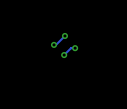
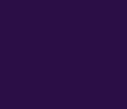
track: (64, 35) (54, 44) -> none
via: (64, 35) -> none
via: (54, 44) -> none
track: (75, 48) (71, 48) (64, 55) -> none
via: (75, 48) -> none
via: (64, 55) -> none

